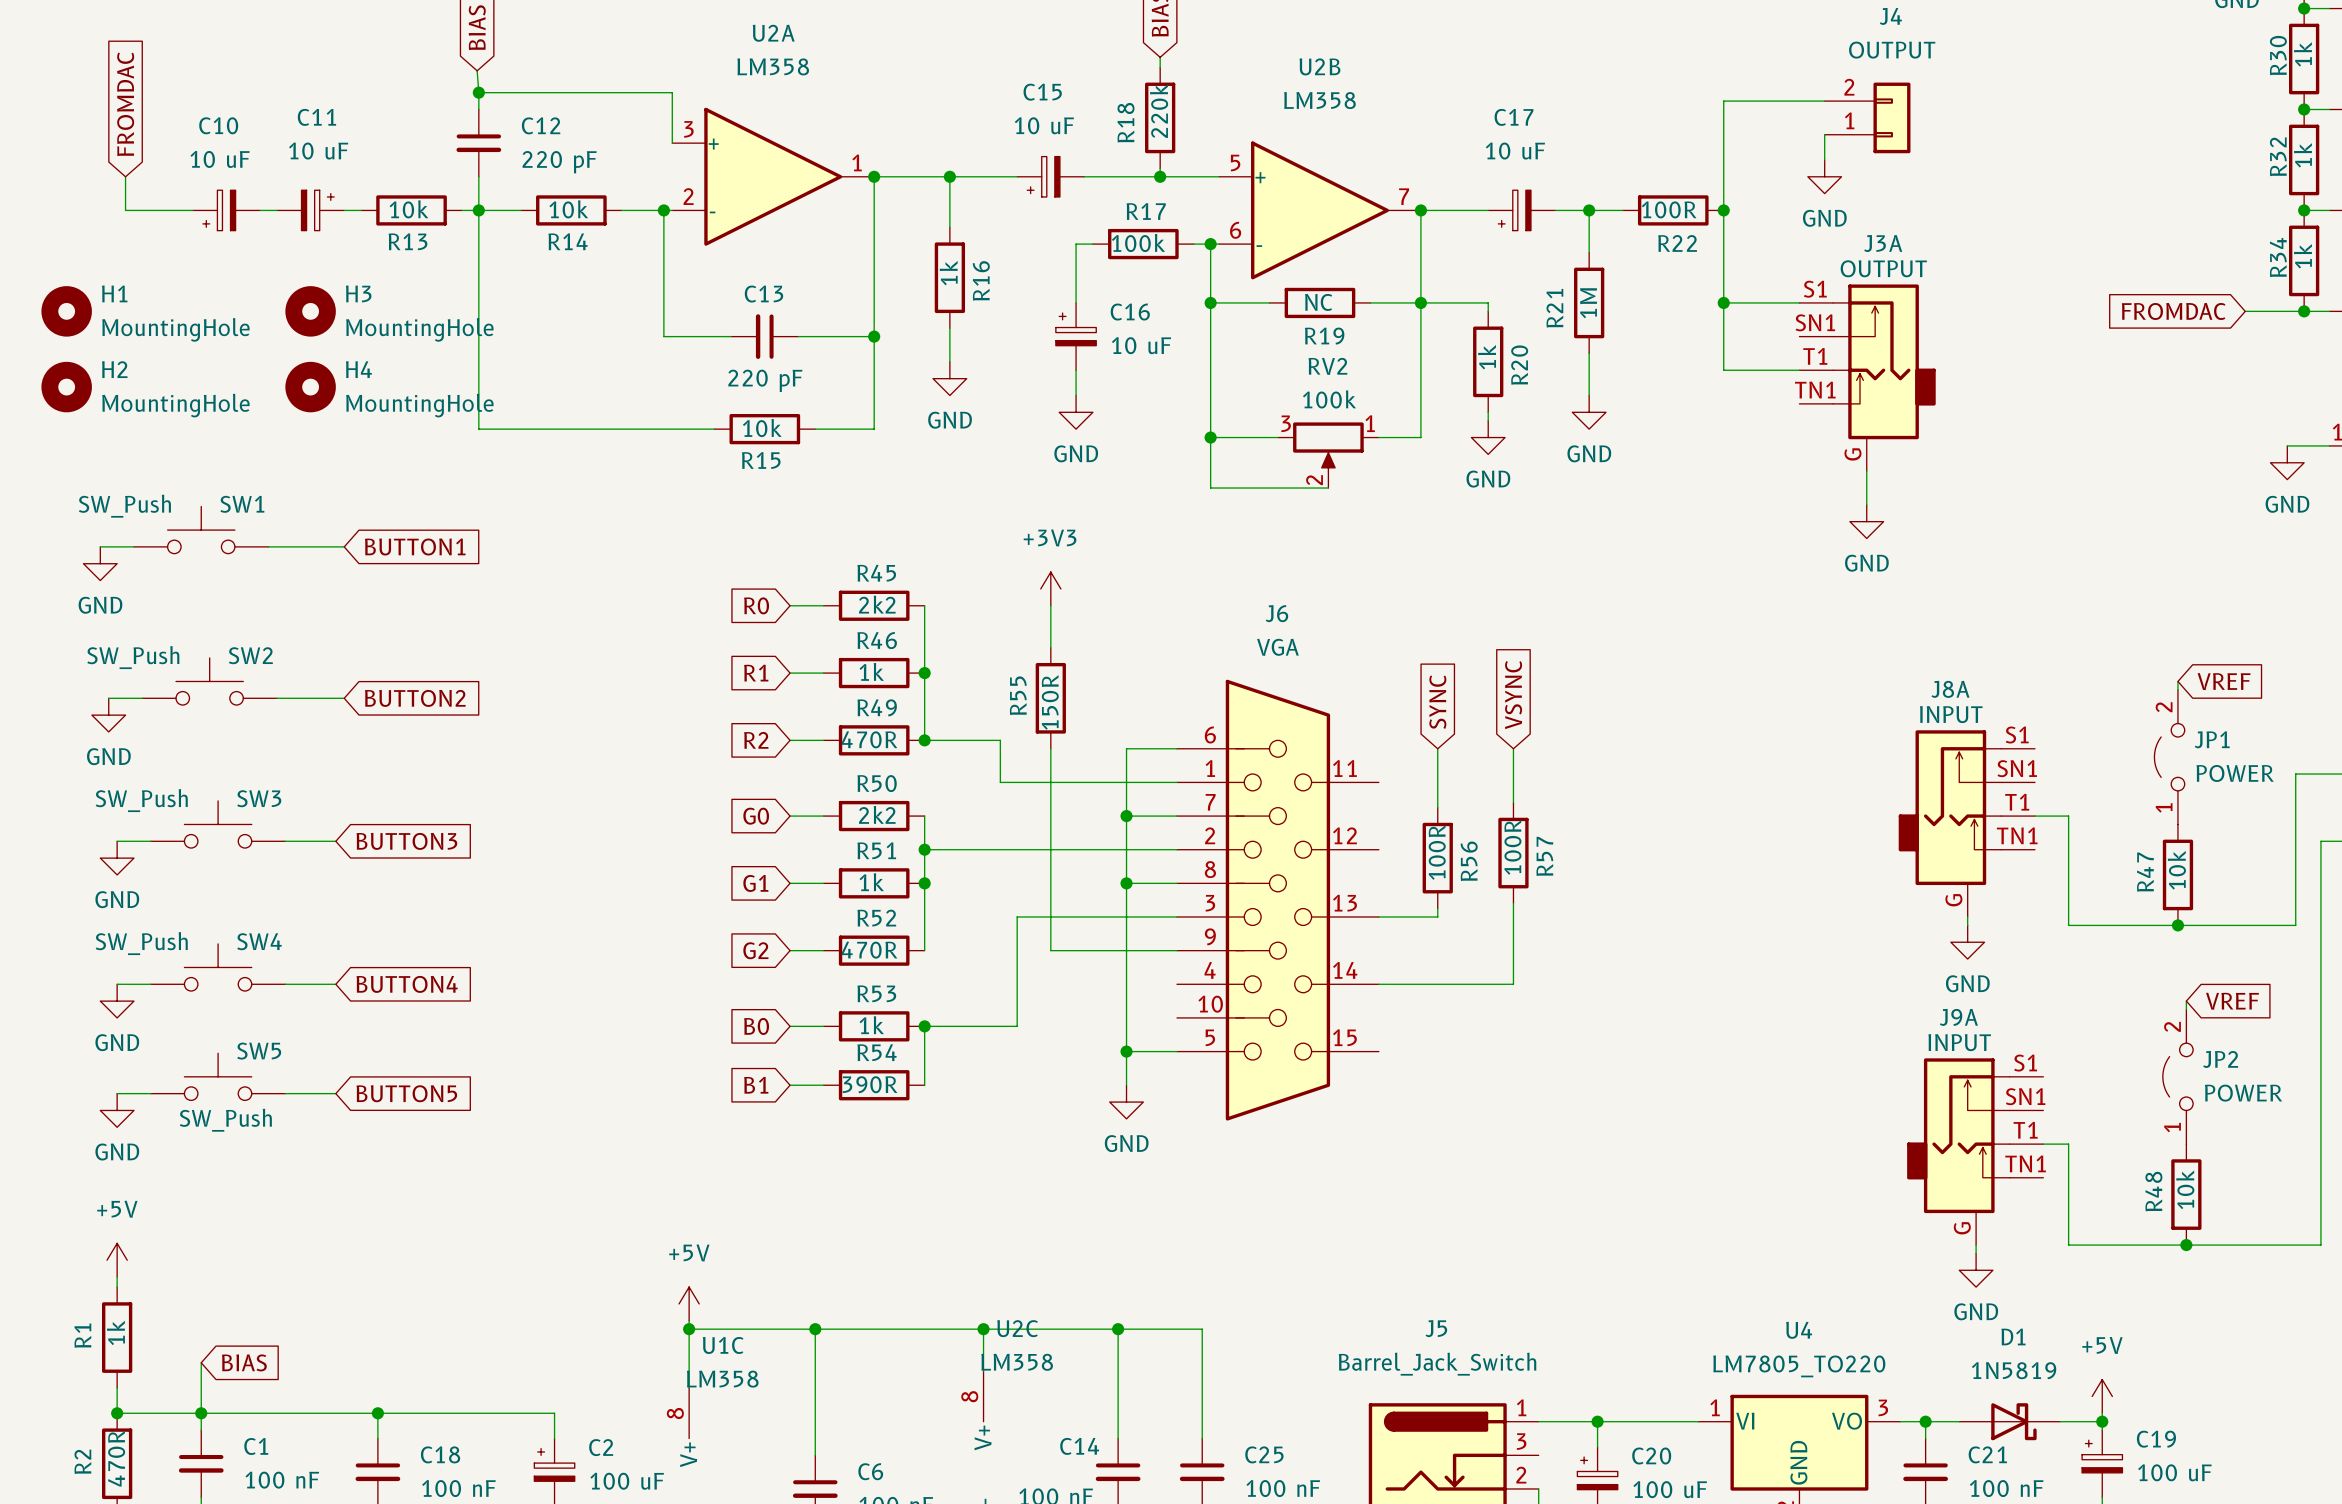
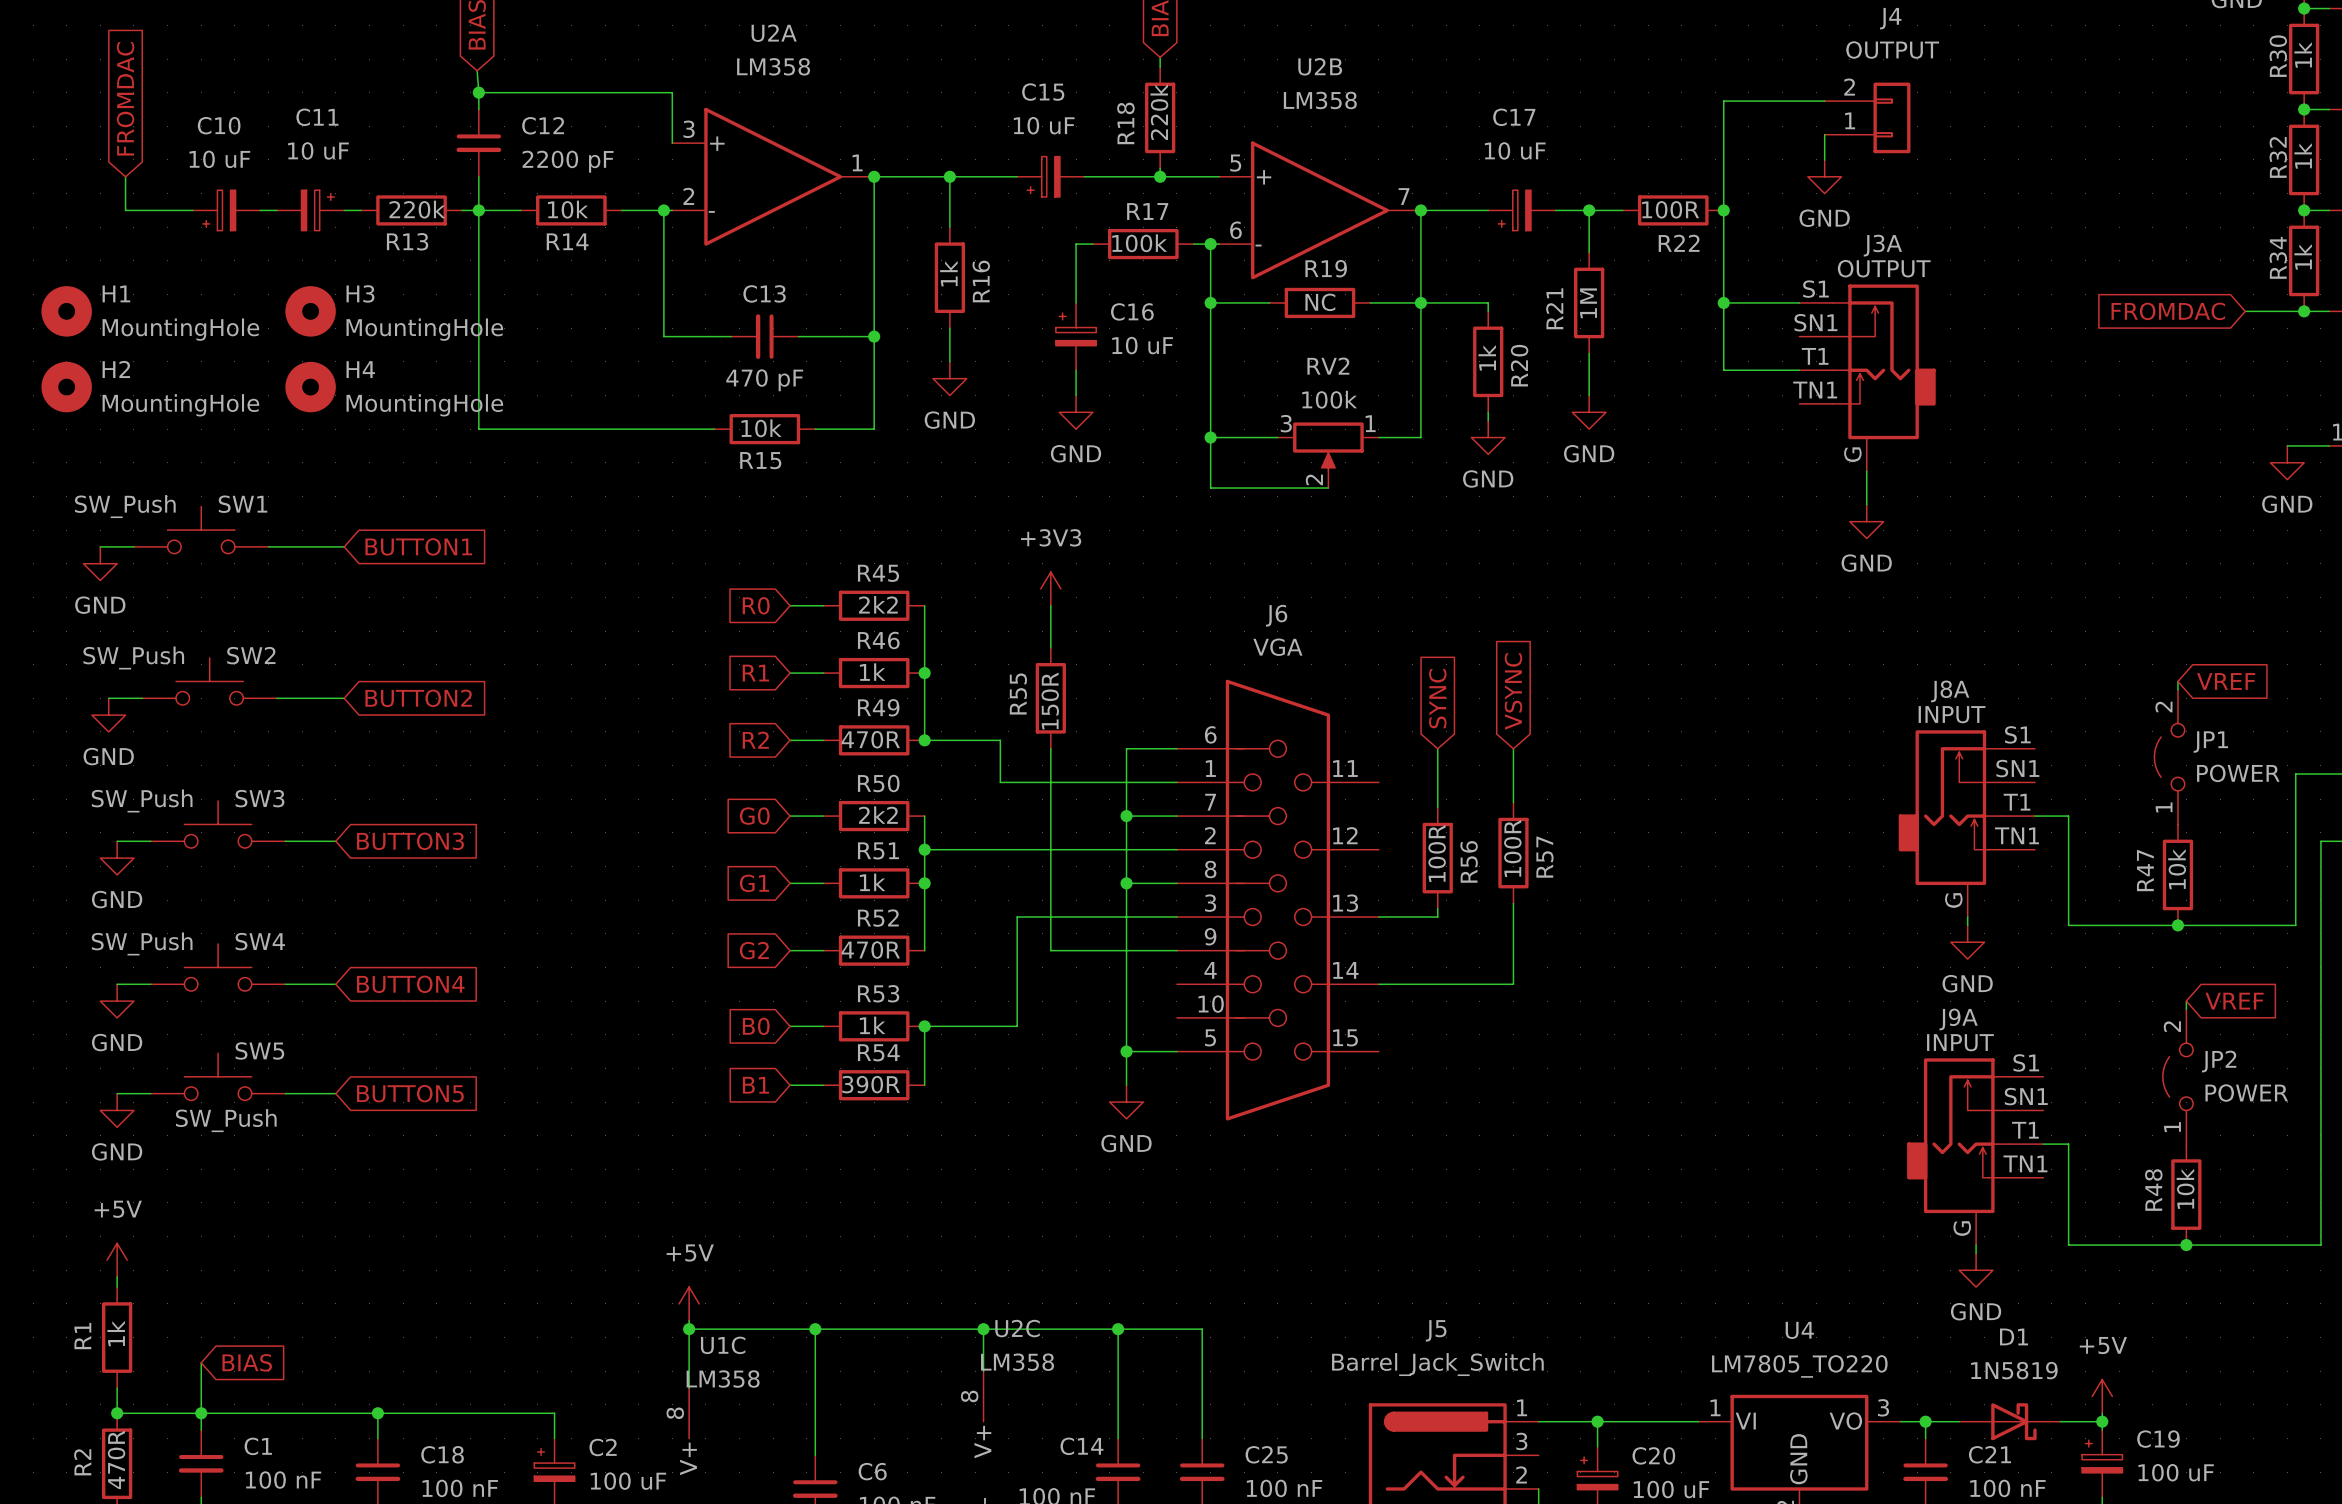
C12 value: 220 pF (559, 162) -> 2200 pF (568, 161)
R13 value: 10k (408, 209) -> 220k (417, 209)
R19 name position: R19 (1324, 336) -> R19 (1326, 268)
C13 value: 220 pF (765, 380) -> 470 pF (764, 380)

